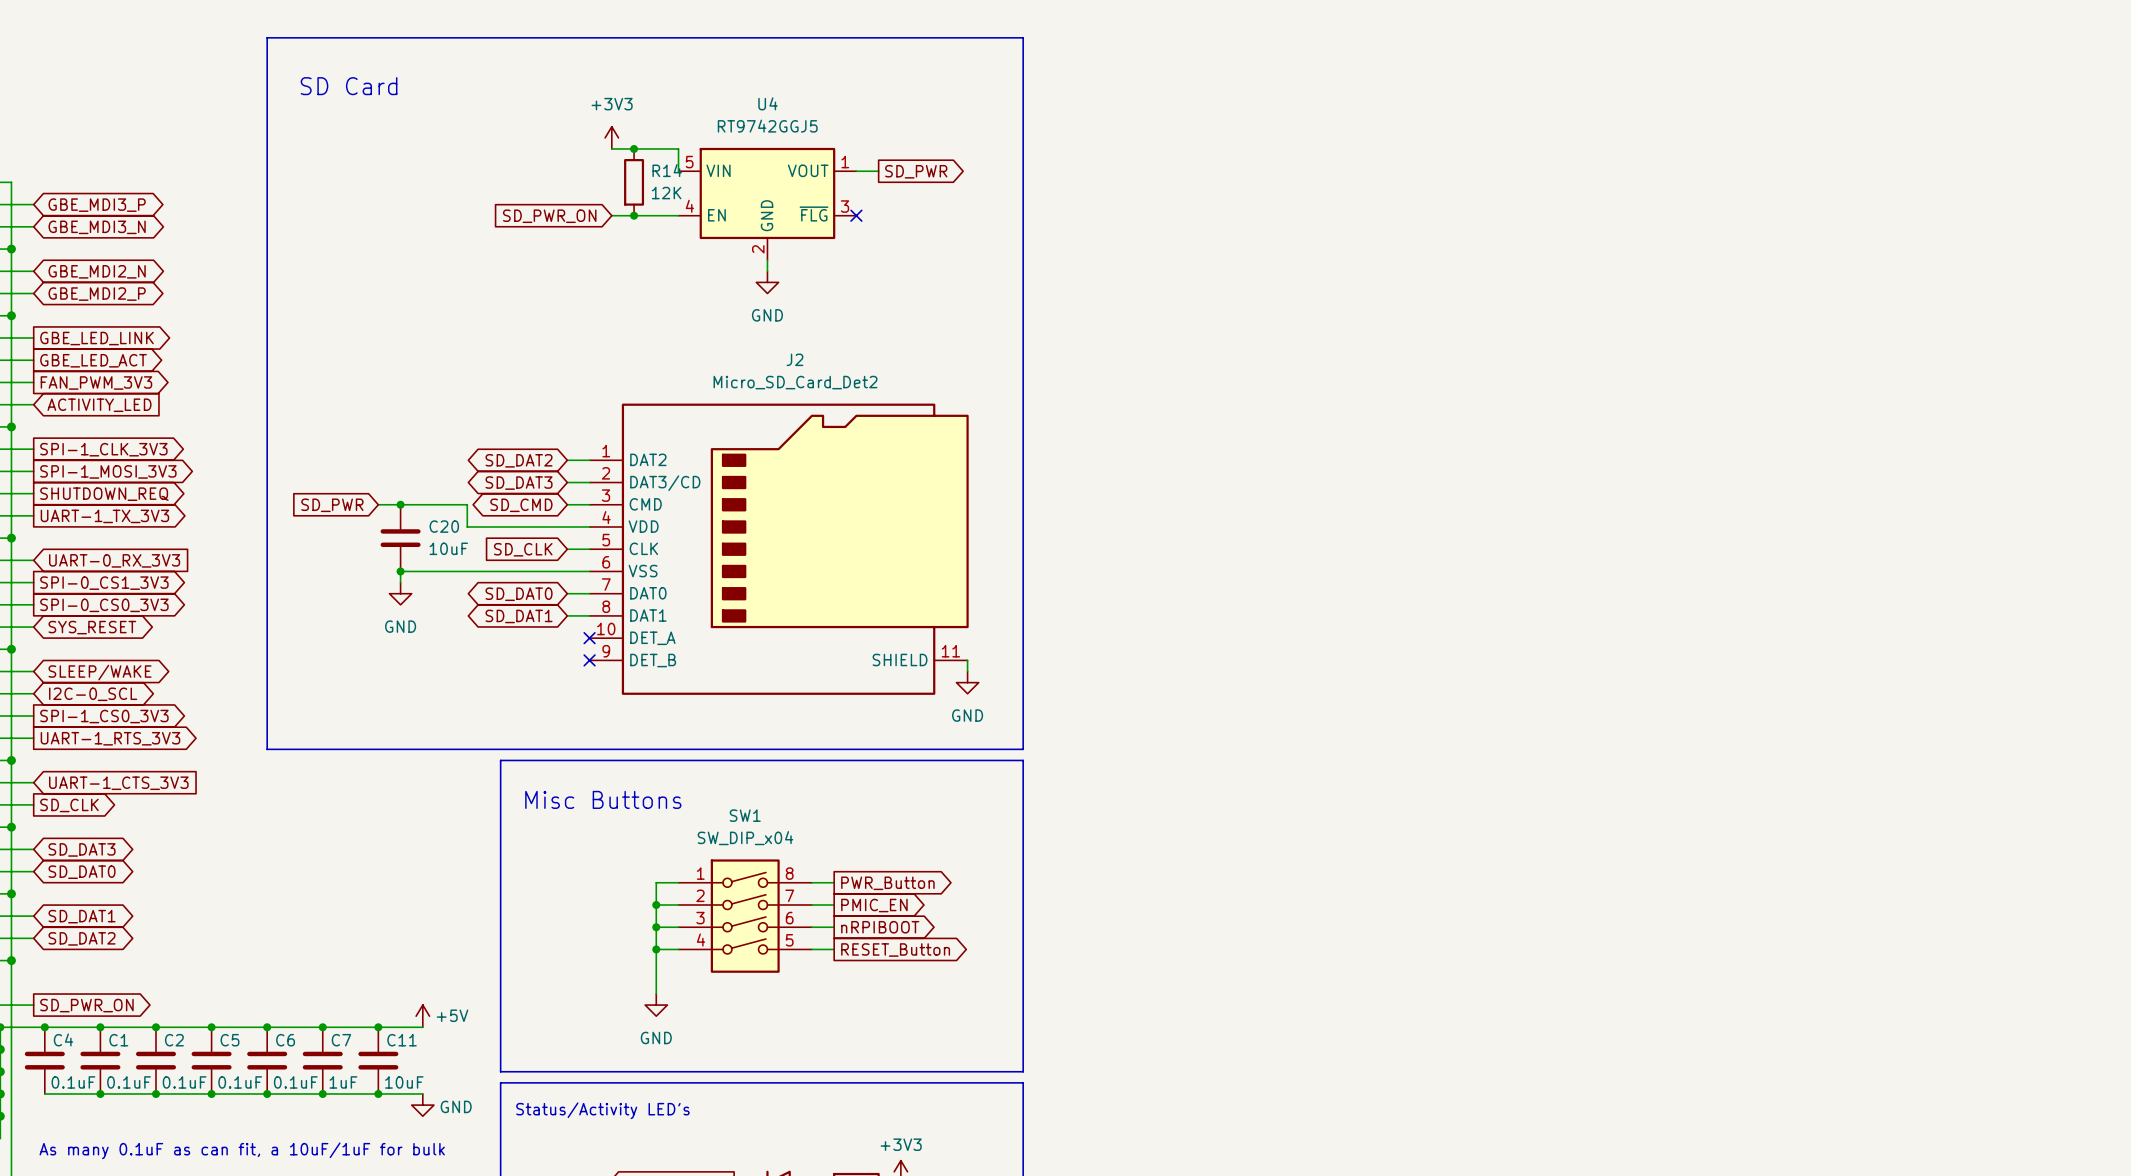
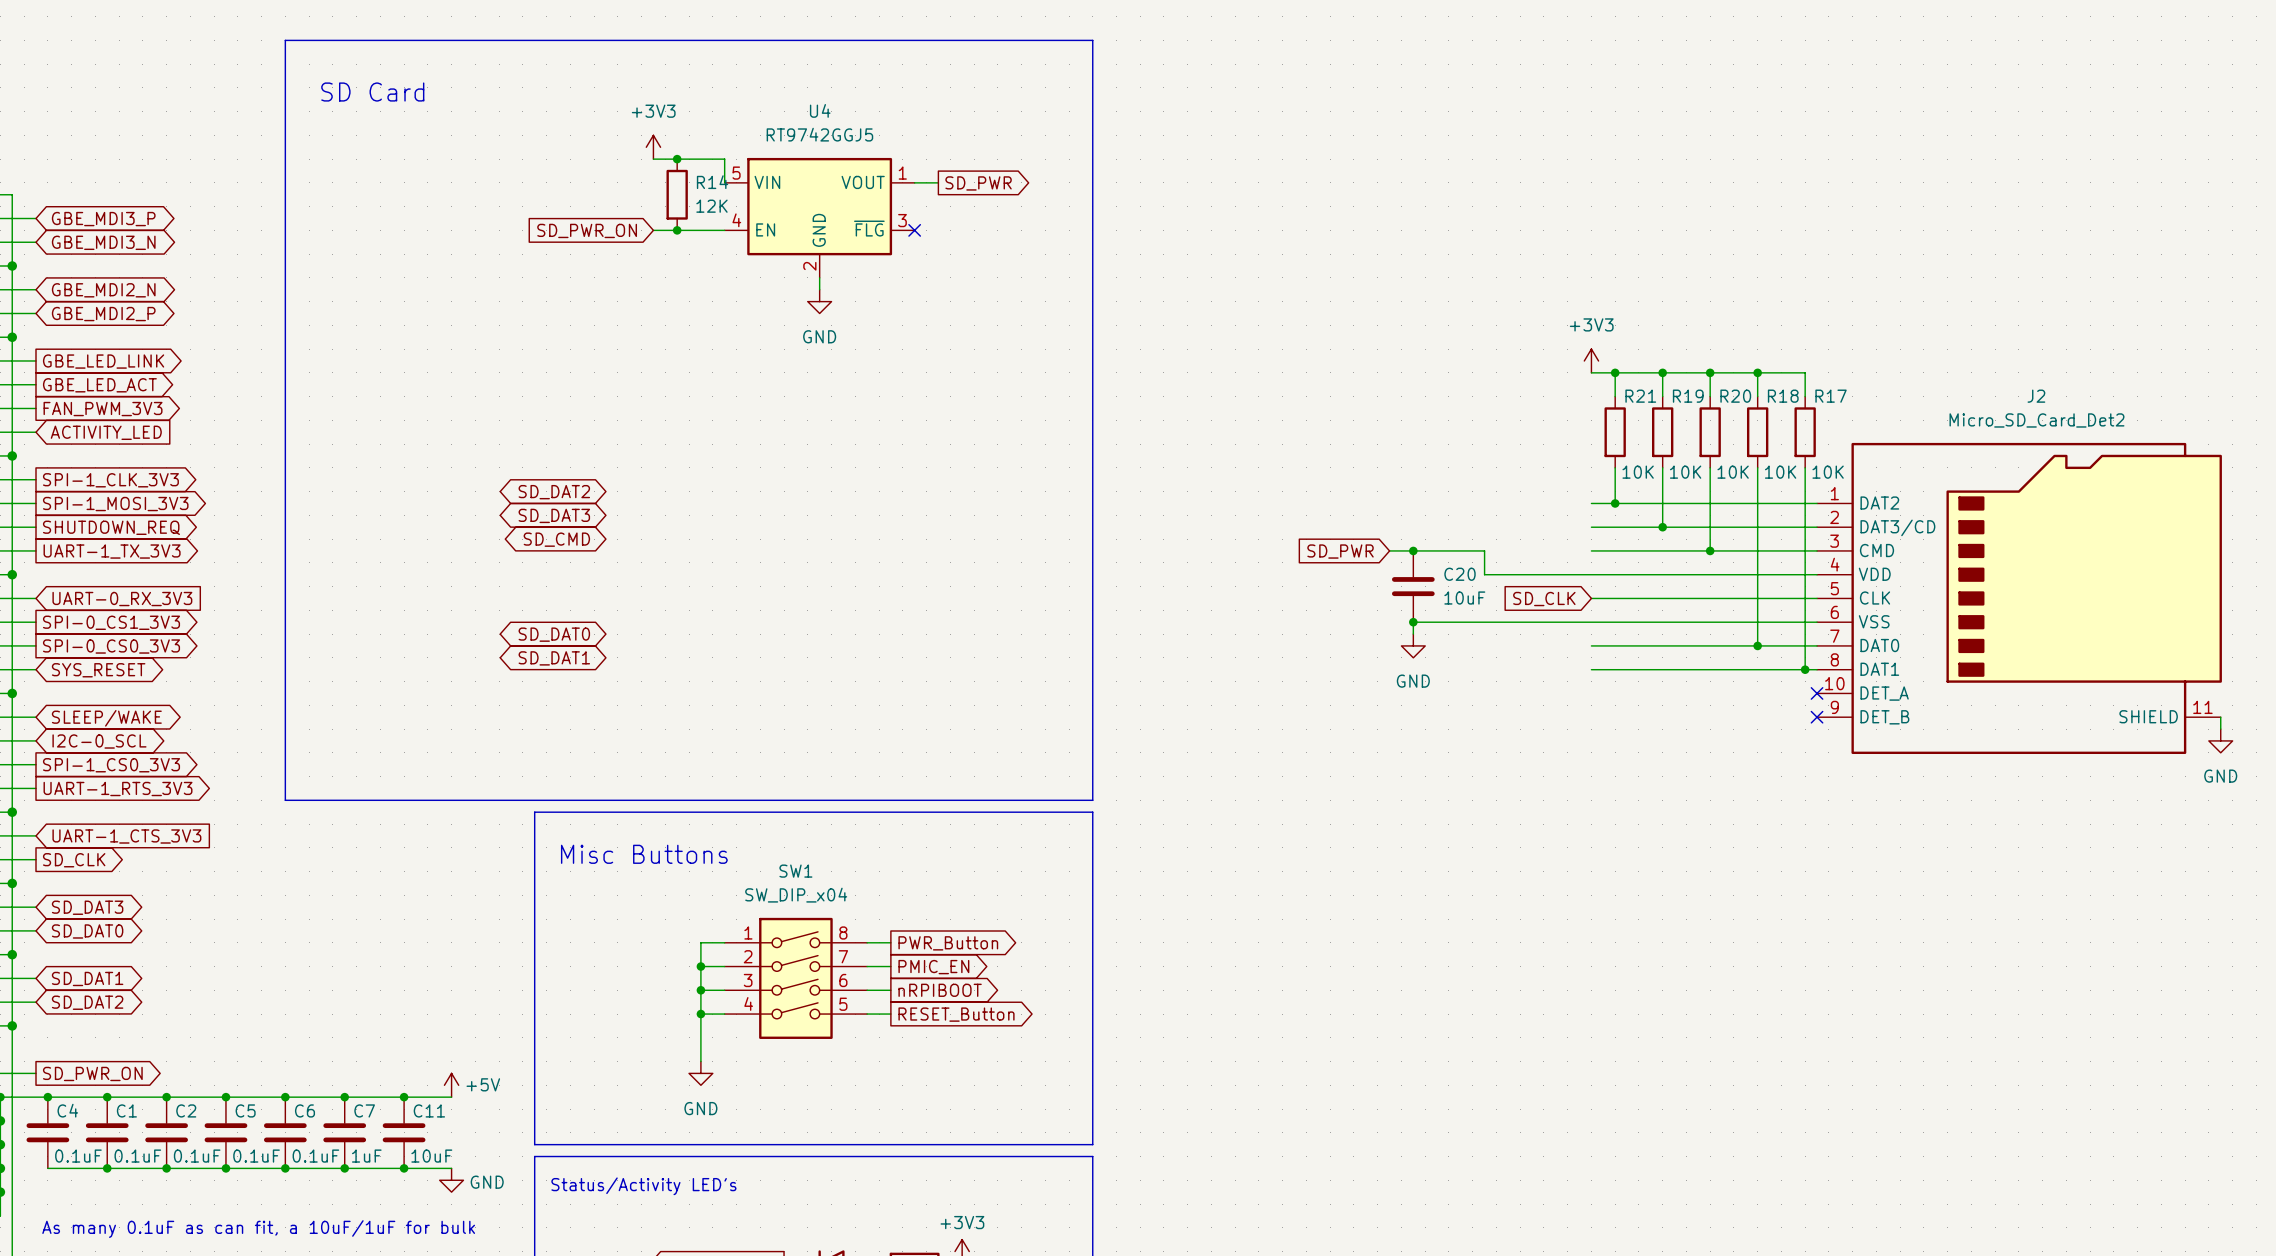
power symbol: none -> +3V3 (1591, 360)
wire: none -> (1591, 372) (1805, 372) (1805, 396)
wire: none -> (1615, 372) (1615, 396)
junction: none -> (1615, 372)
wire: none -> (1662, 372) (1662, 396)
junction: none -> (1662, 372)
wire: none -> (1710, 372) (1710, 396)
junction: none -> (1710, 372)
wire: none -> (1757, 372) (1757, 396)
junction: none -> (1757, 372)
R21: none -> 10K (1615, 432)
R19: none -> 10K (1662, 432)
R20: none -> 10K (1710, 432)
R18: none -> 10K (1757, 432)
R17: none -> 10K (1805, 432)
wire: none -> (1615, 467) (1615, 503)
wire: none -> (1662, 467) (1662, 527)
wire: none -> (1710, 467) (1710, 550)
wire: none -> (1757, 467) (1757, 645)
wire: none -> (1805, 467) (1805, 669)
wire: (567, 460) (589, 460) -> none
wire: none -> (1591, 503) (1817, 503)
junction: none -> (1615, 503)
wire: (567, 482) (589, 482) -> none
wire: none -> (1591, 527) (1817, 527)
junction: none -> (1662, 527)
wire: (378, 504) (467, 504) (467, 527) (589, 527) -> none
junction: (400, 504) -> none
wire: (567, 504) (589, 504) -> none
global label: SD_PWR (332, 505) -> none
wire: none -> (1389, 550) (1484, 550) (1484, 574) (1817, 574)
junction: none -> (1413, 550)
wire: none -> (1591, 550) (1817, 550)
junction: none -> (1710, 550)
global label: none -> SD_PWR (1340, 551)
C20 position: (400, 538) -> (1413, 586)
global label: SD_CLK (523, 549) -> none
wire: (567, 549) (589, 549) -> none
J2 position: (779, 549) -> (2019, 598)
global label: none -> SD_CLK (1544, 599)
wire: none -> (1591, 598) (1817, 598)
junction: (400, 571) -> none
wire: (589, 571) (400, 571) (400, 582) -> none
junction: none -> (1413, 622)
wire: none -> (1817, 622) (1413, 622) (1413, 634)
power symbol: GND (400, 593) -> none
wire: (567, 593) (589, 593) -> none
power symbol: none -> GND (1413, 645)
wire: none -> (1591, 645) (1817, 645)
junction: none -> (1757, 645)
wire: (567, 615) (589, 615) -> none
wire: none -> (1591, 669) (1817, 669)
junction: none -> (1805, 669)
no-connect mark: (589, 638) -> none
no-connect mark: none -> (1817, 693)
no-connect mark: (589, 660) -> none
wire: (967, 660) (967, 671) -> none
no-connect mark: none -> (1817, 717)
wire: none -> (2220, 717) (2220, 729)
power symbol: GND (967, 682) -> none
power symbol: none -> GND (2220, 740)

